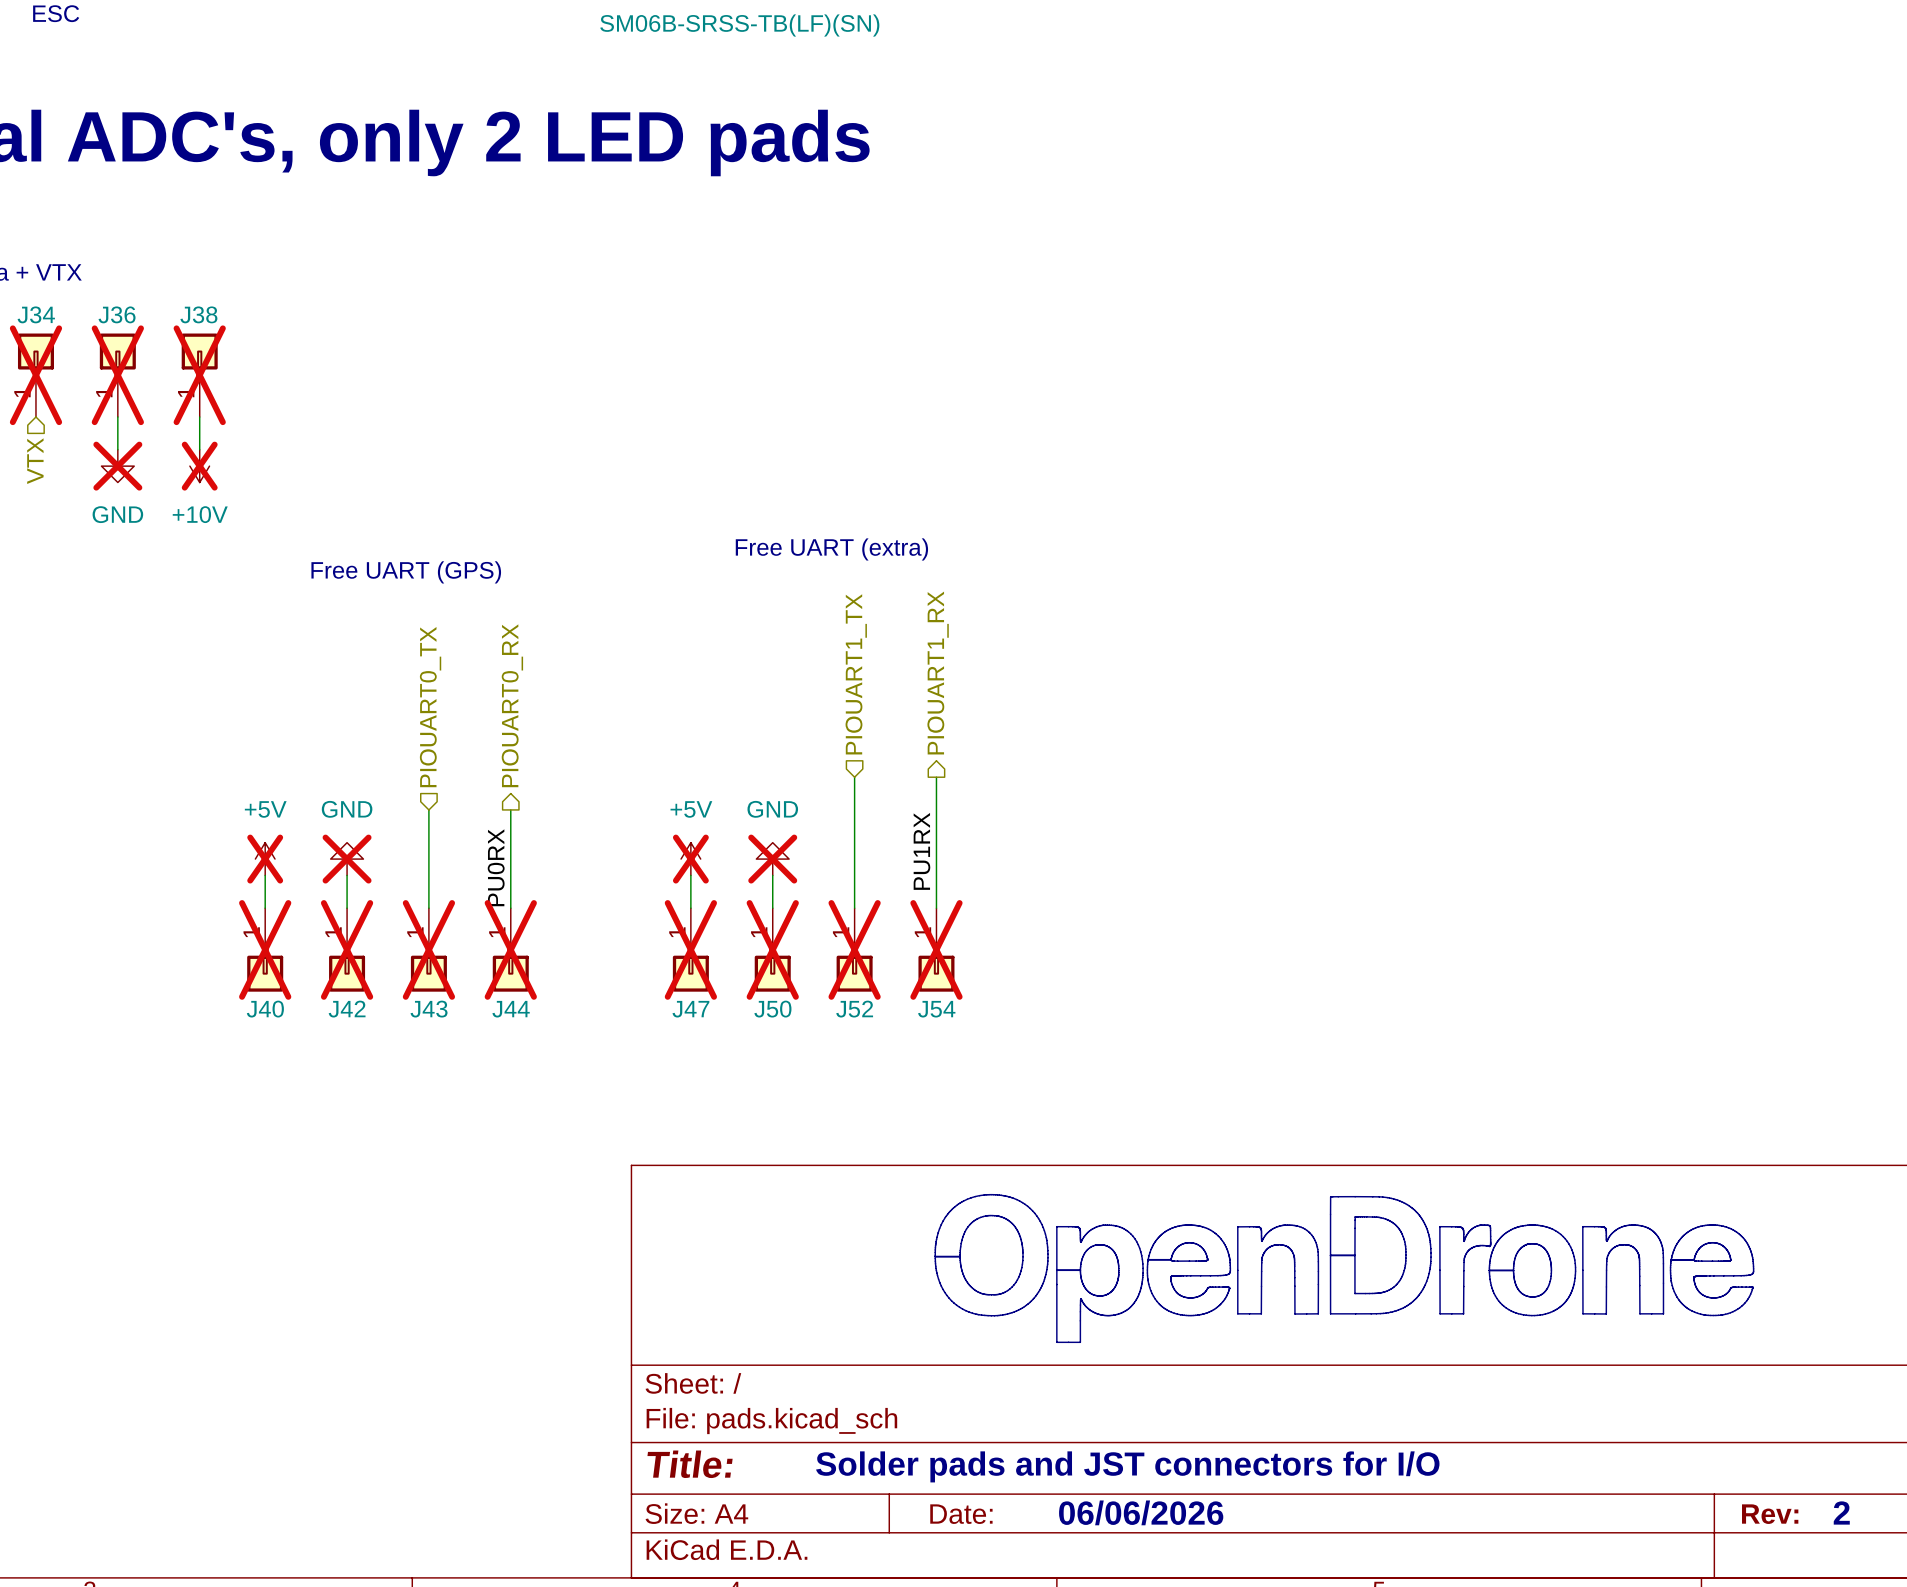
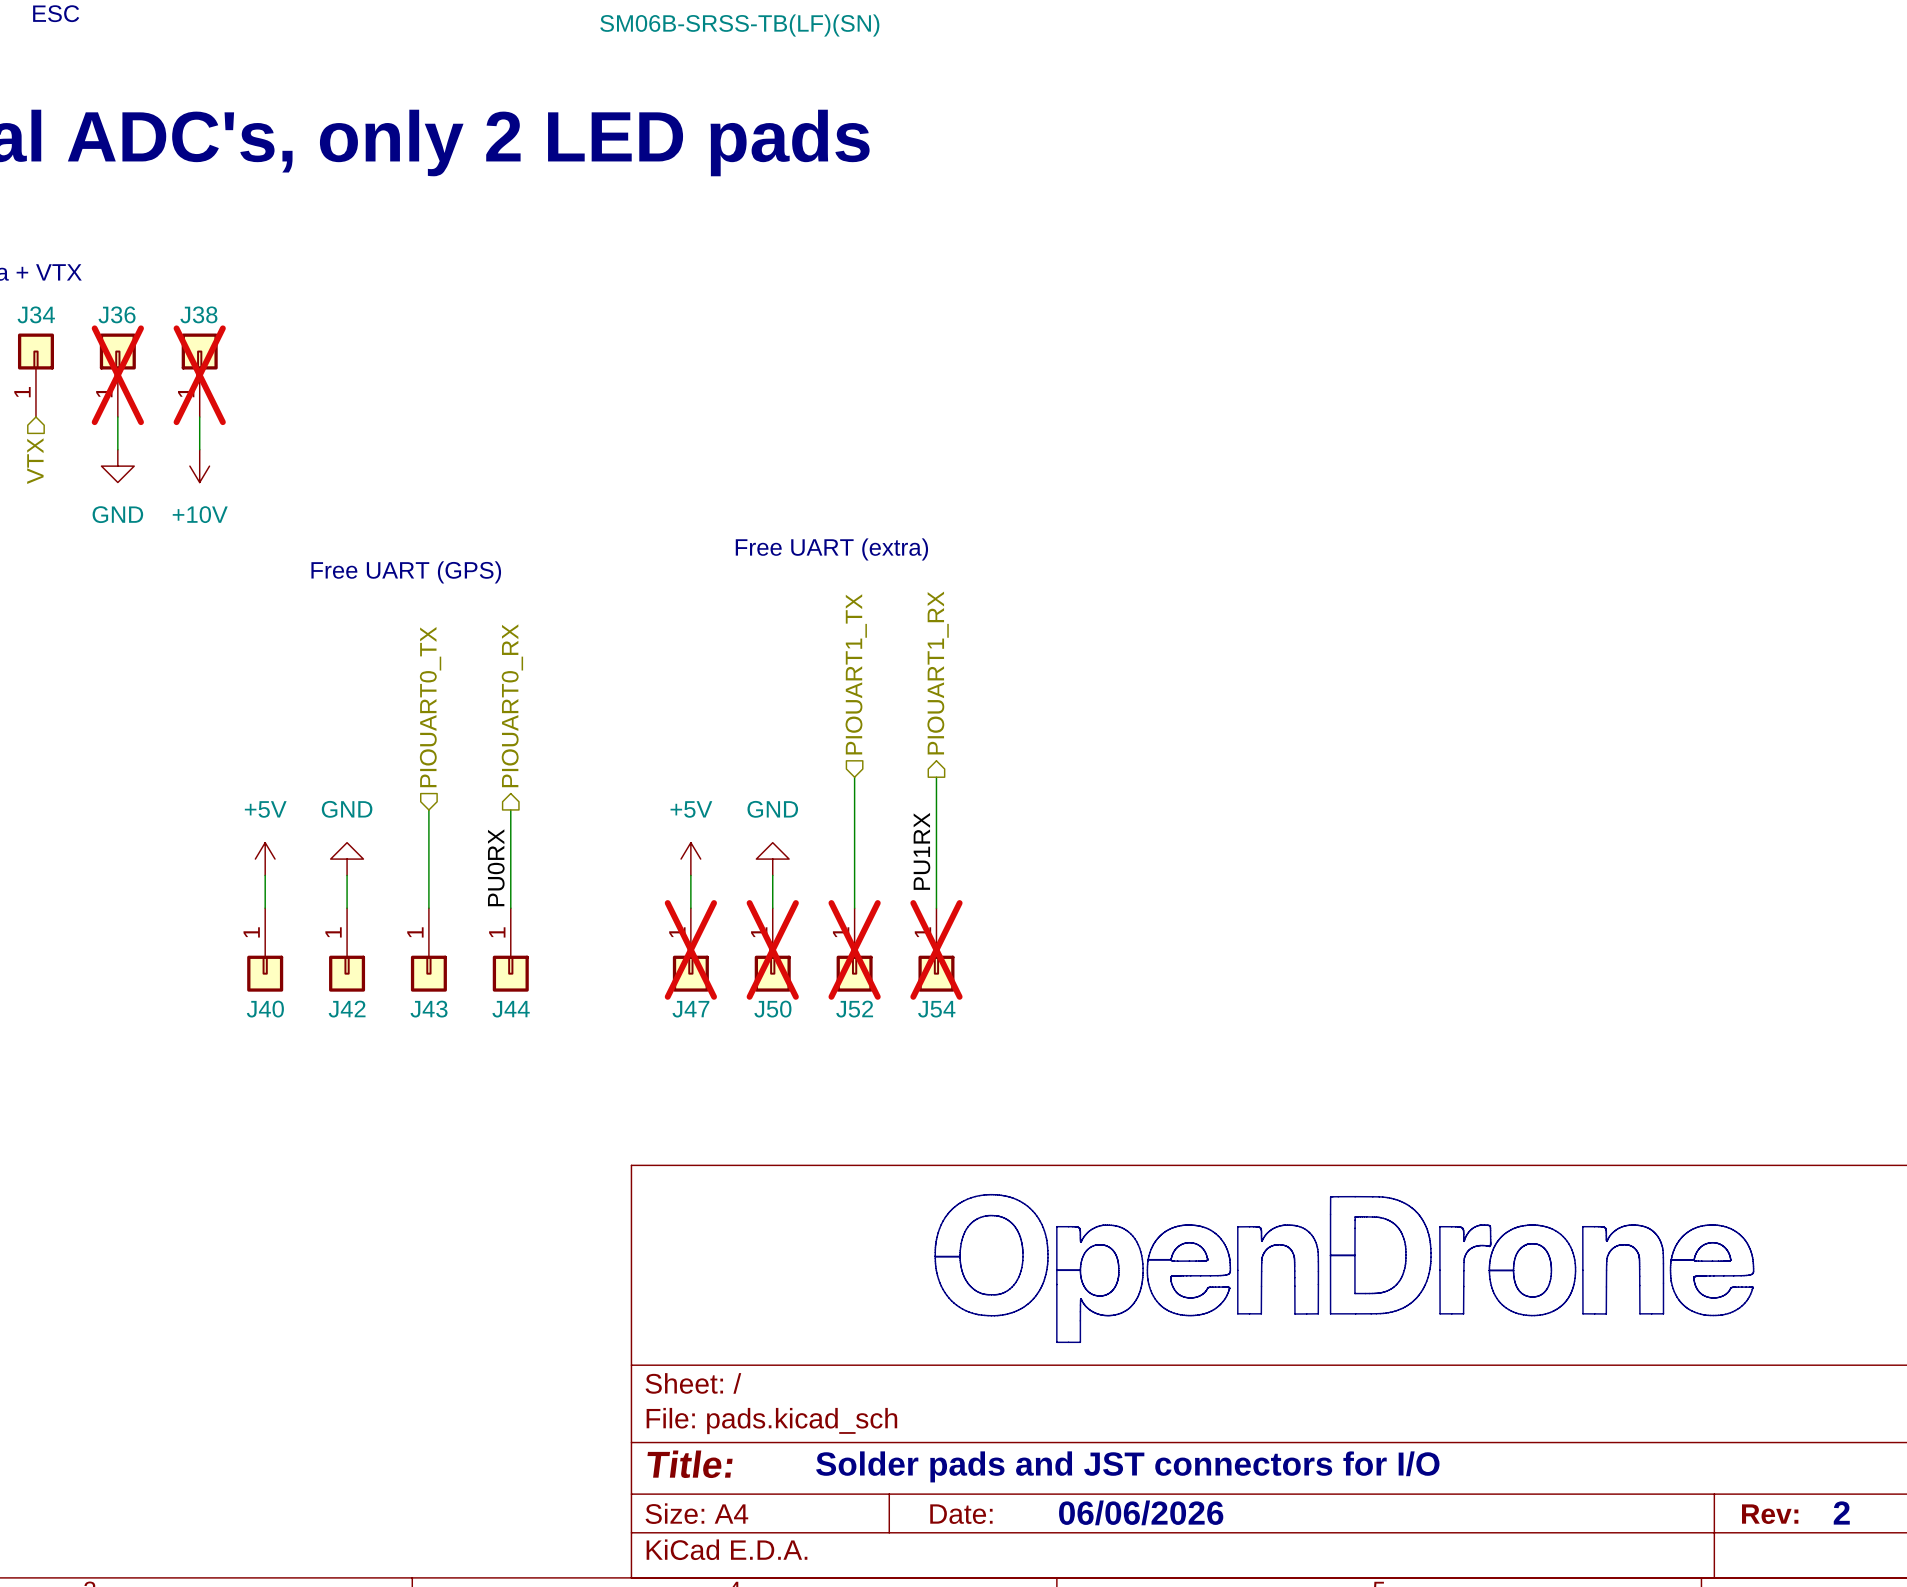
J34 do-not-place cross: (35, 375) -> none
power symbol do-not-place cross: (117, 466) -> none
power symbol do-not-place cross: (199, 466) -> none
power symbol do-not-place cross: (265, 859) -> none
power symbol do-not-place cross: (347, 859) -> none
power symbol do-not-place cross: (690, 859) -> none
power symbol do-not-place cross: (772, 859) -> none
J40 do-not-place cross: (265, 949) -> none
J42 do-not-place cross: (347, 949) -> none
J43 do-not-place cross: (428, 949) -> none
J44 do-not-place cross: (510, 949) -> none

